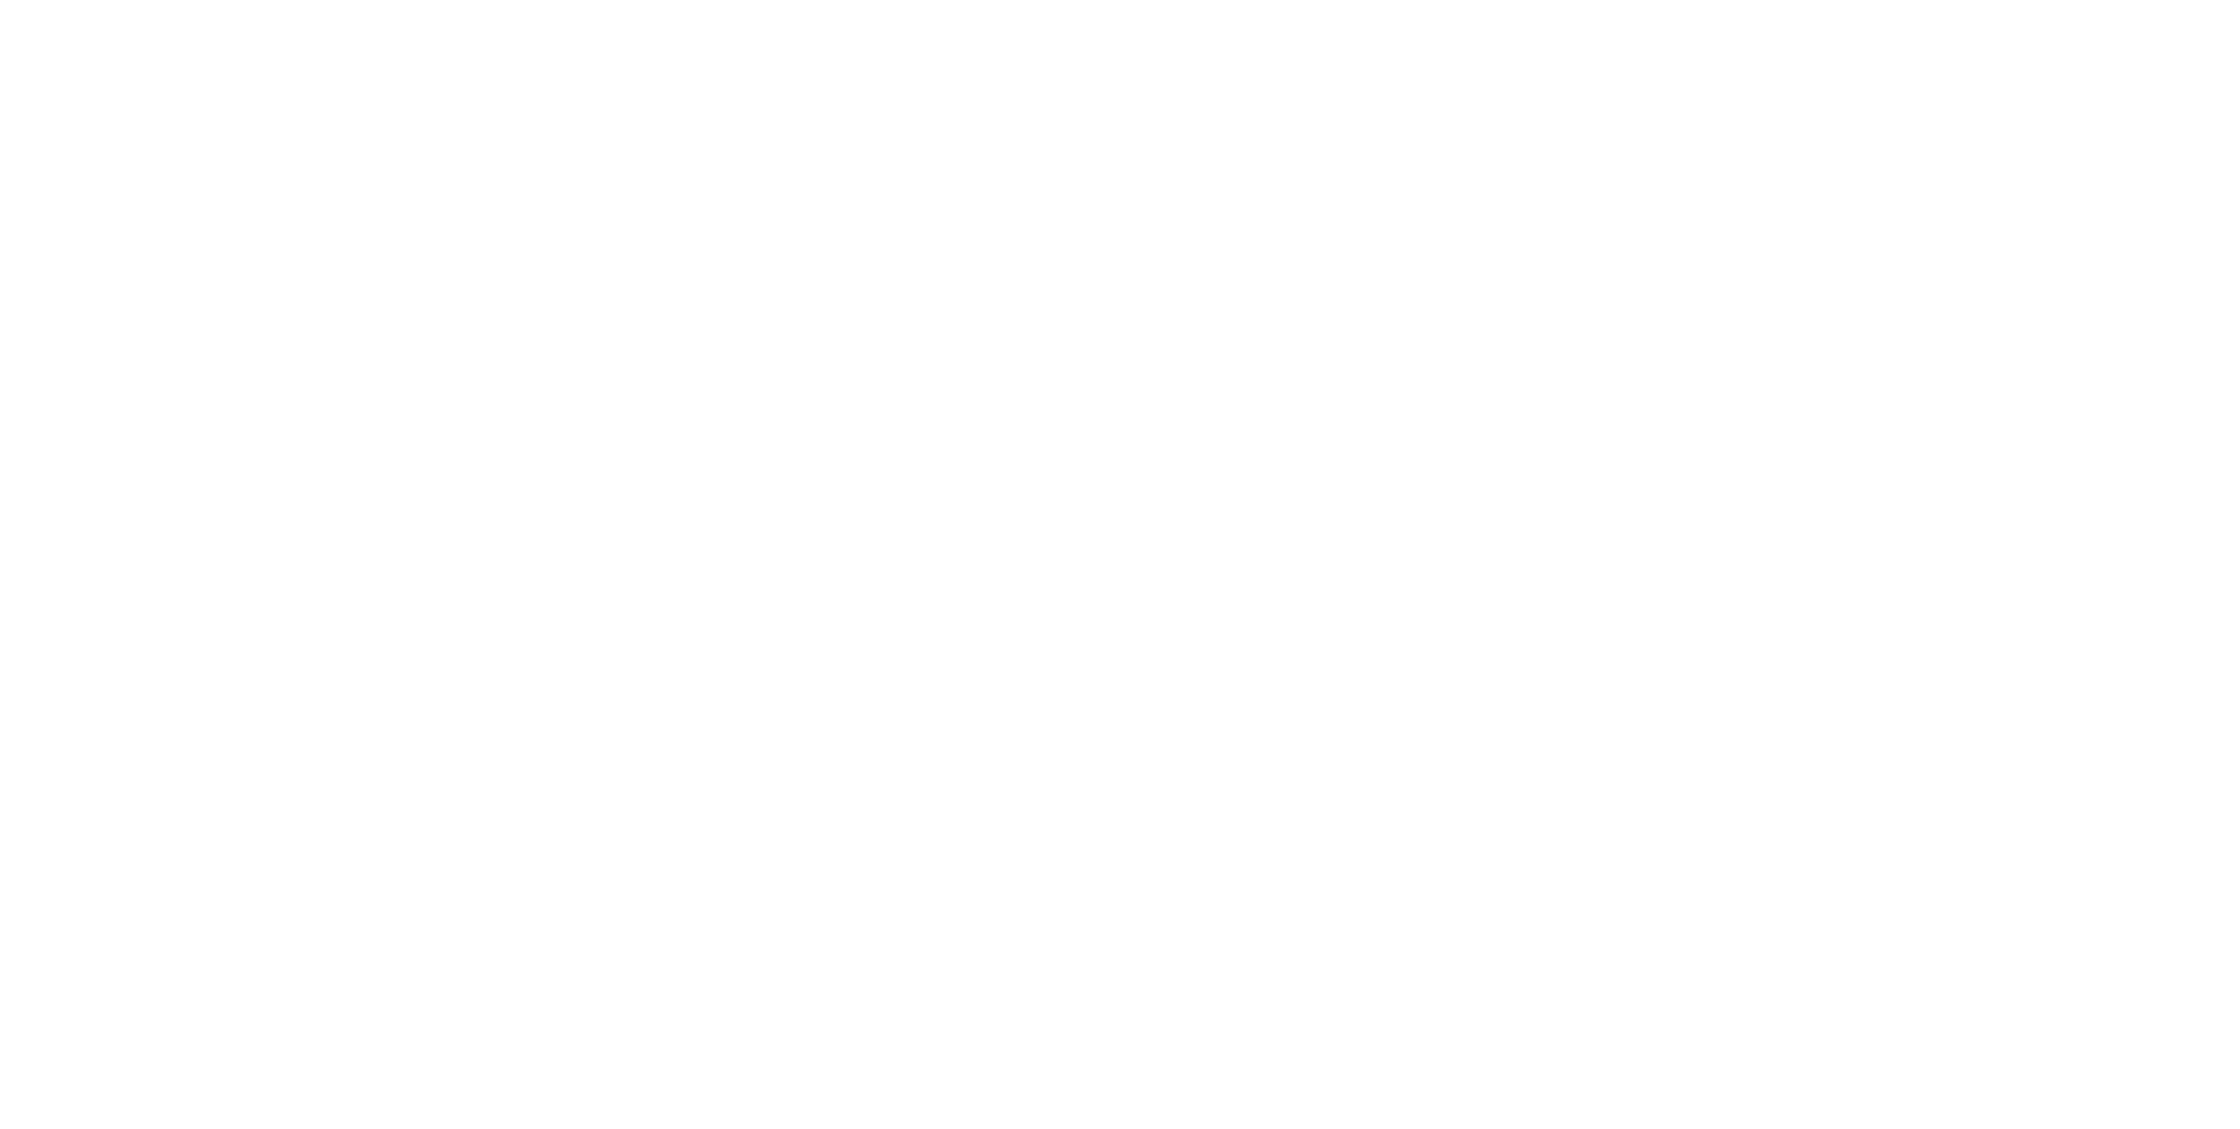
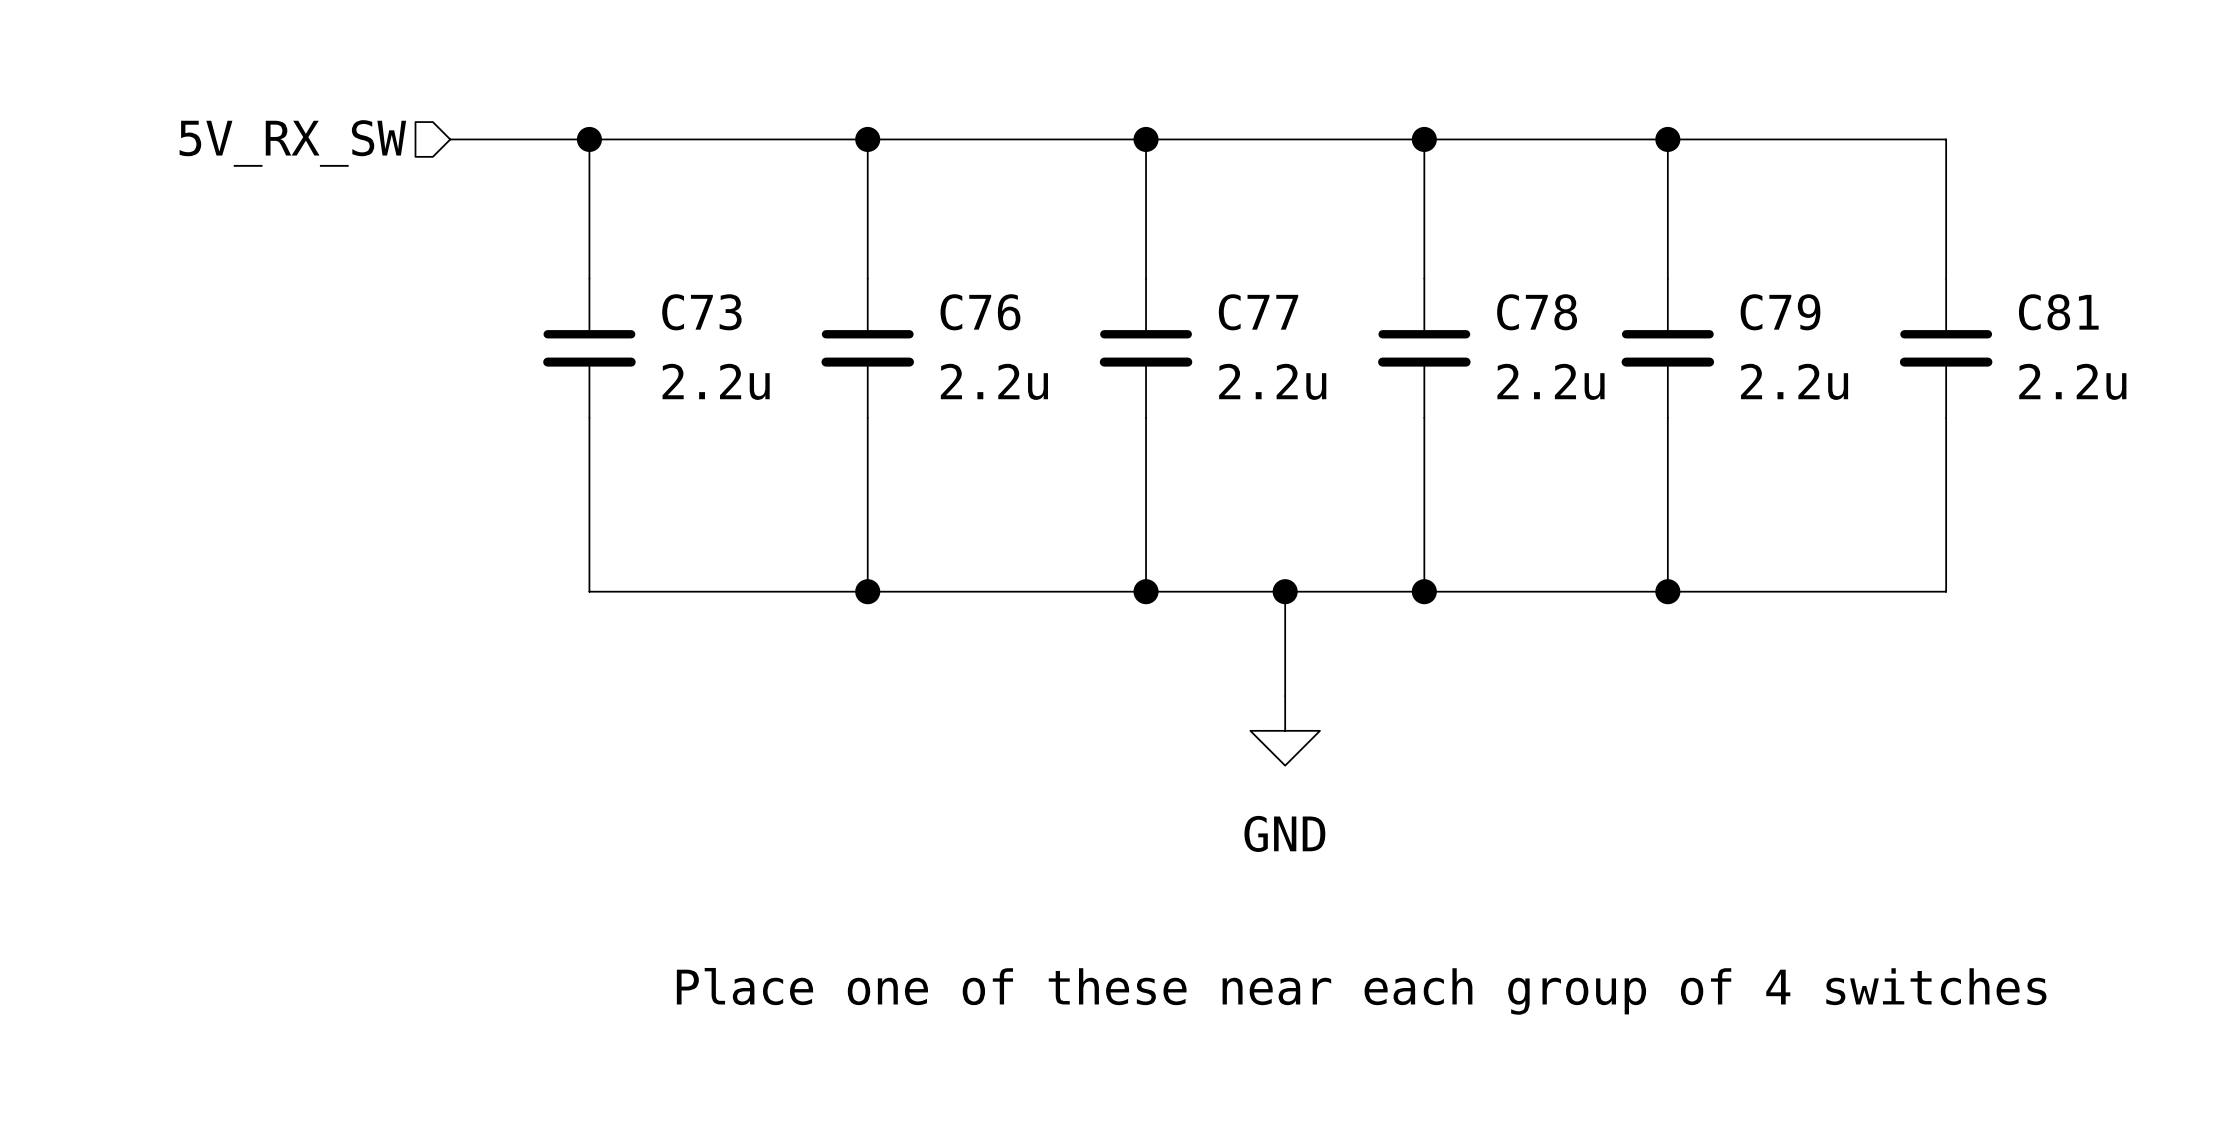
wire: none -> (450, 139) (1946, 139) (1946, 278)
wire: none -> (589, 139) (589, 278)
junction: none -> (589, 139)
wire: none -> (867, 139) (867, 278)
junction: none -> (867, 139)
wire: none -> (1146, 139) (1146, 278)
junction: none -> (1146, 139)
wire: none -> (1424, 139) (1424, 278)
junction: none -> (1424, 139)
wire: none -> (1667, 139) (1667, 278)
junction: none -> (1667, 139)
hierarchical label: none -> 5V_RX_SW (292, 143)
C73: none -> 2.2u (589, 348)
C76: none -> 2.2u (867, 348)
C77: none -> 2.2u (1146, 348)
C78: none -> 2.2u (1424, 348)
C79: none -> 2.2u (1667, 348)
C81: none -> 2.2u (1946, 348)
wire: none -> (589, 417) (589, 591) (1946, 591) (1946, 417)
wire: none -> (867, 417) (867, 591)
wire: none -> (1146, 417) (1146, 591)
wire: none -> (1424, 417) (1424, 591)
wire: none -> (1667, 417) (1667, 591)
junction: none -> (867, 591)
junction: none -> (1146, 591)
wire: none -> (1285, 591) (1285, 696)
junction: none -> (1285, 591)
junction: none -> (1424, 591)
junction: none -> (1667, 591)
power symbol: none -> GND (1285, 730)
text: none -> Place one of these near each group of 4 switches (1361, 991)

